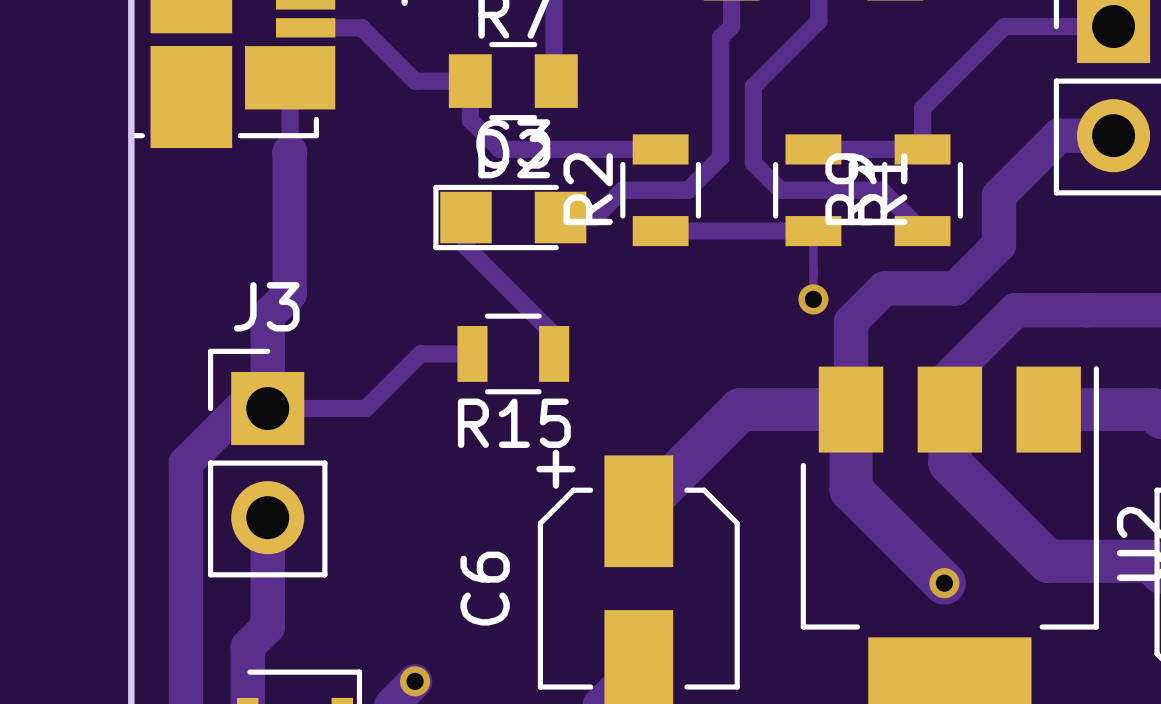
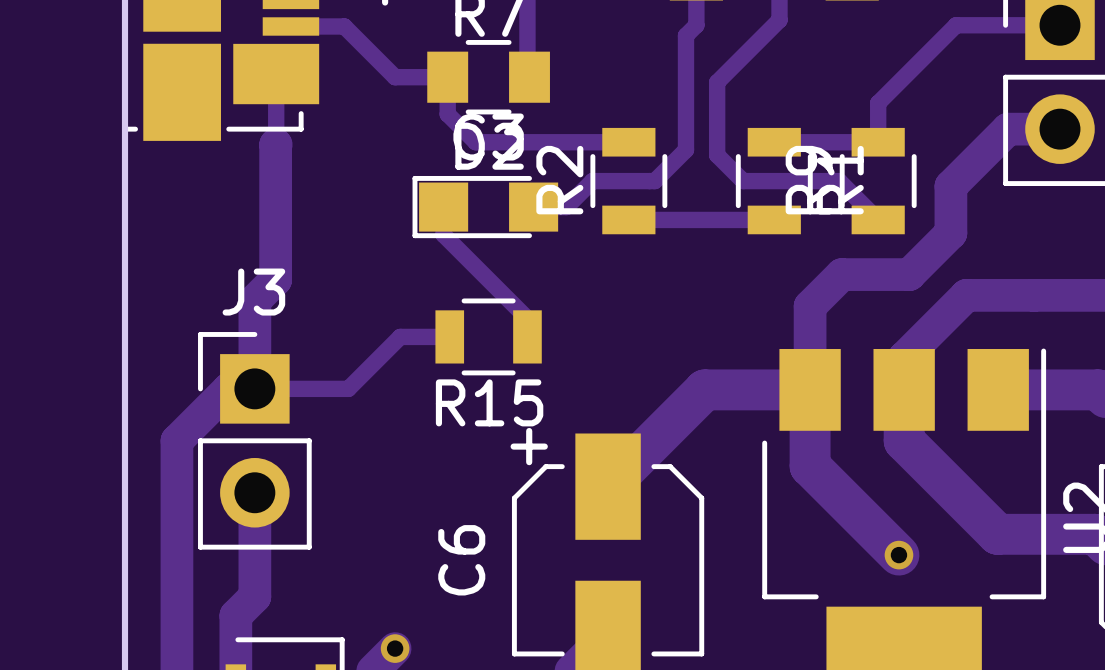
track: (813, 231) (813, 299) -> none
via: (813, 299) -> none

